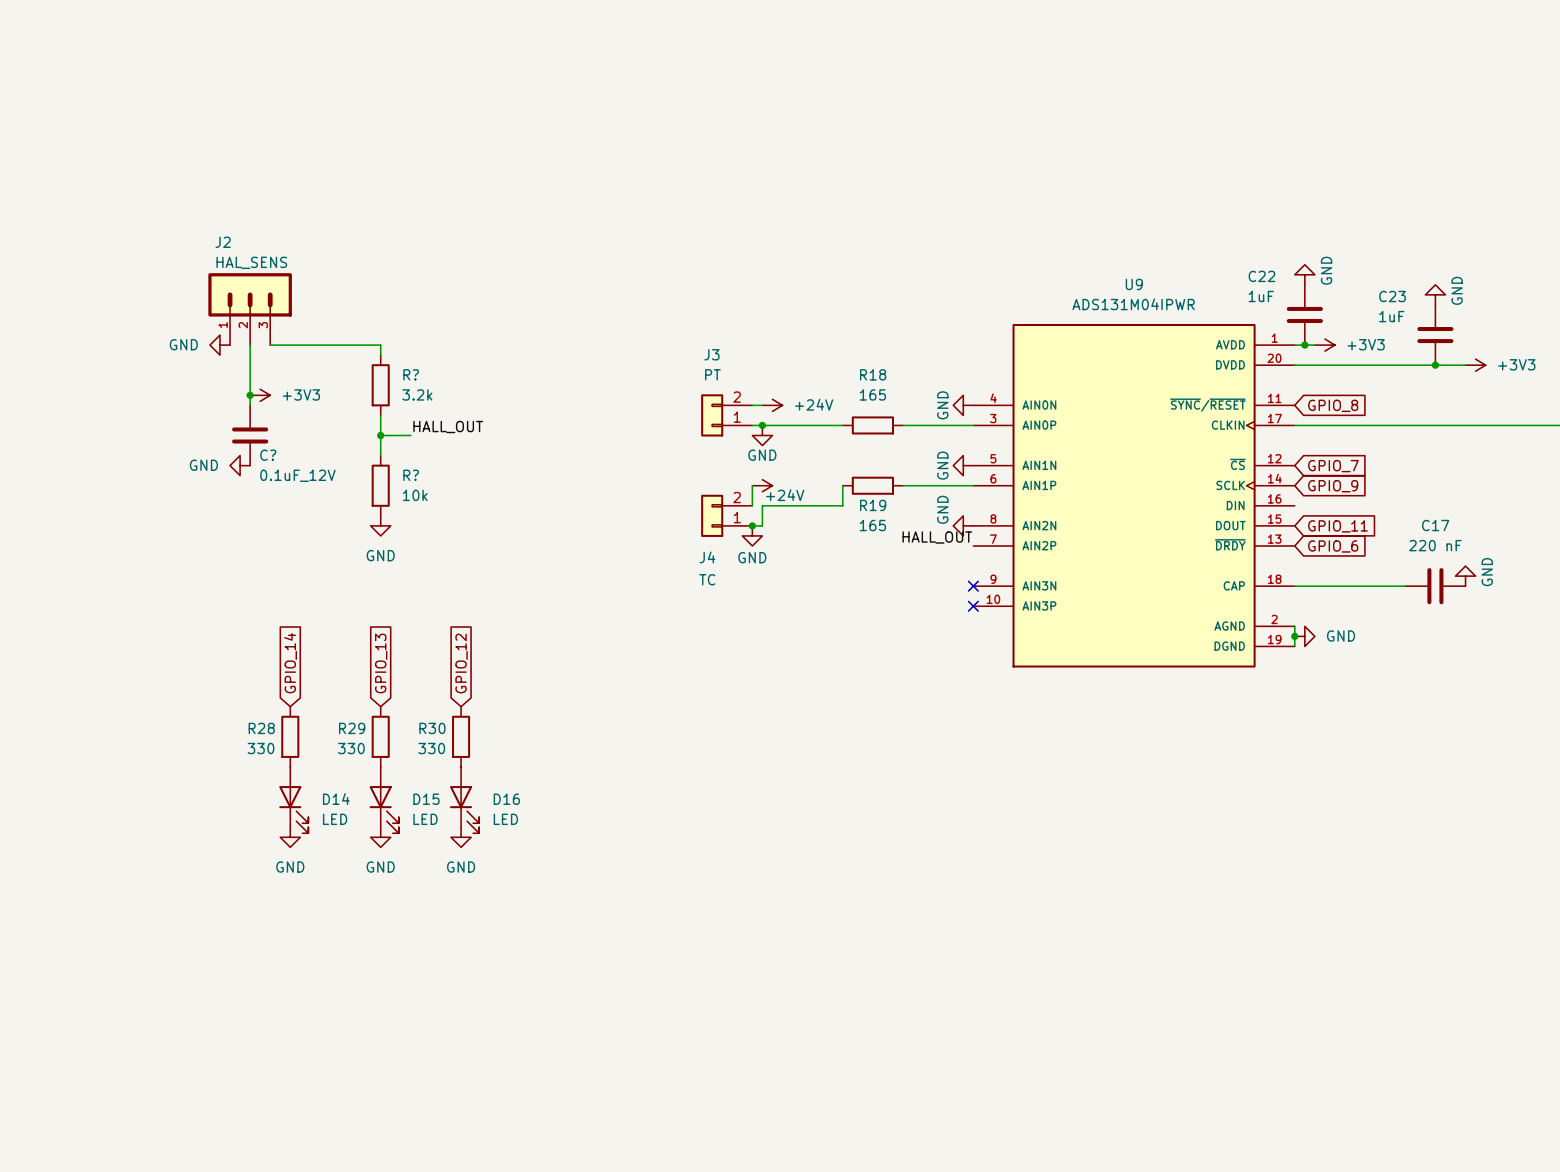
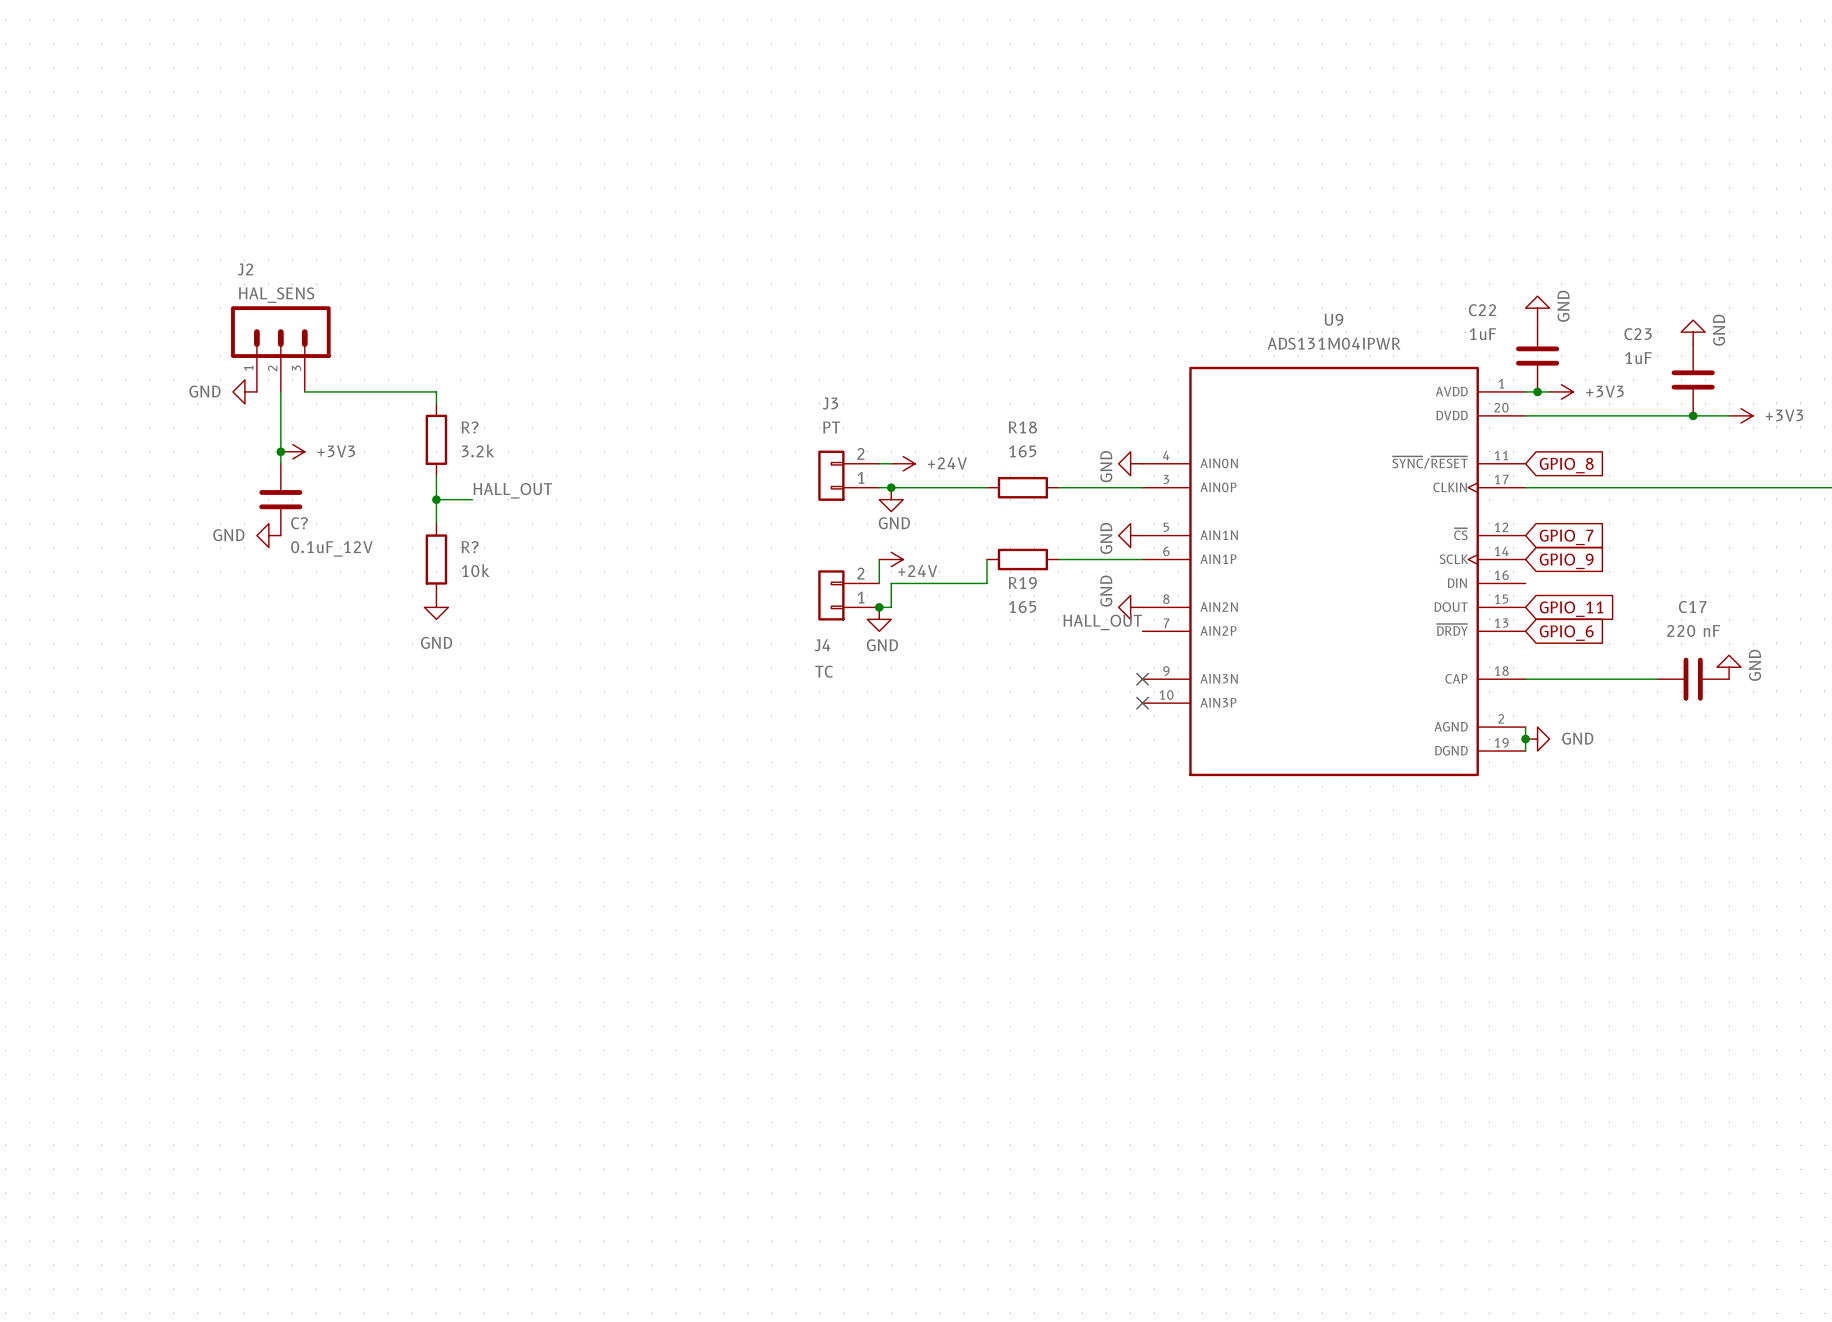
global label: GPIO_14 (290, 663) -> none
global label: GPIO_13 (381, 663) -> none
global label: GPIO_12 (461, 663) -> none
R28: 330 (290, 736) -> none
R29: 330 (380, 736) -> none
R30: 330 (461, 736) -> none
D14: LED (293, 800) -> none
D15: LED (384, 800) -> none
D16: LED (464, 800) -> none
power symbol: GND (290, 837) -> none
power symbol: GND (380, 837) -> none
power symbol: GND (461, 837) -> none

